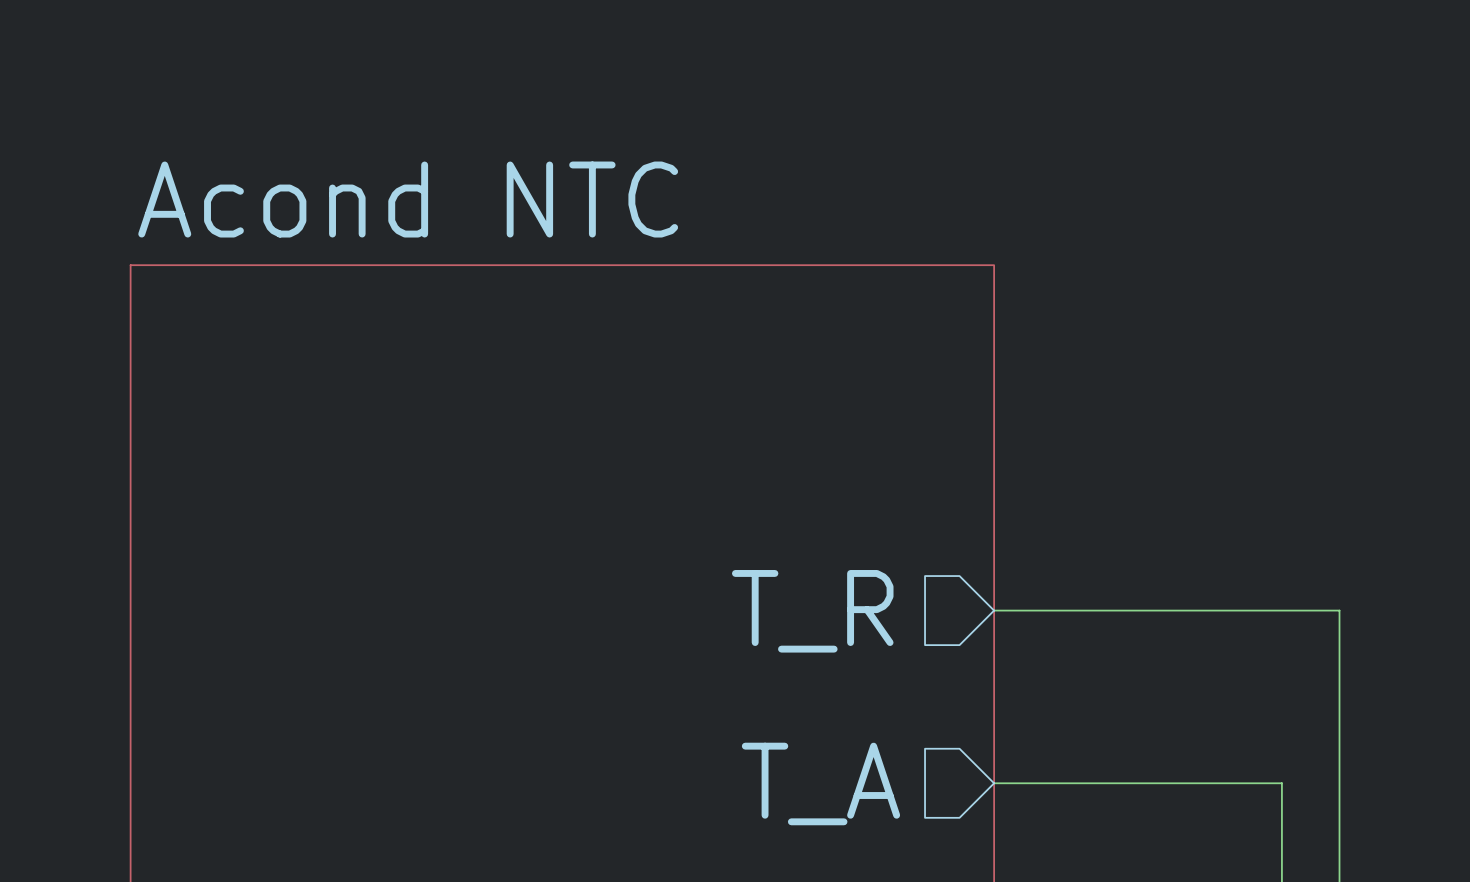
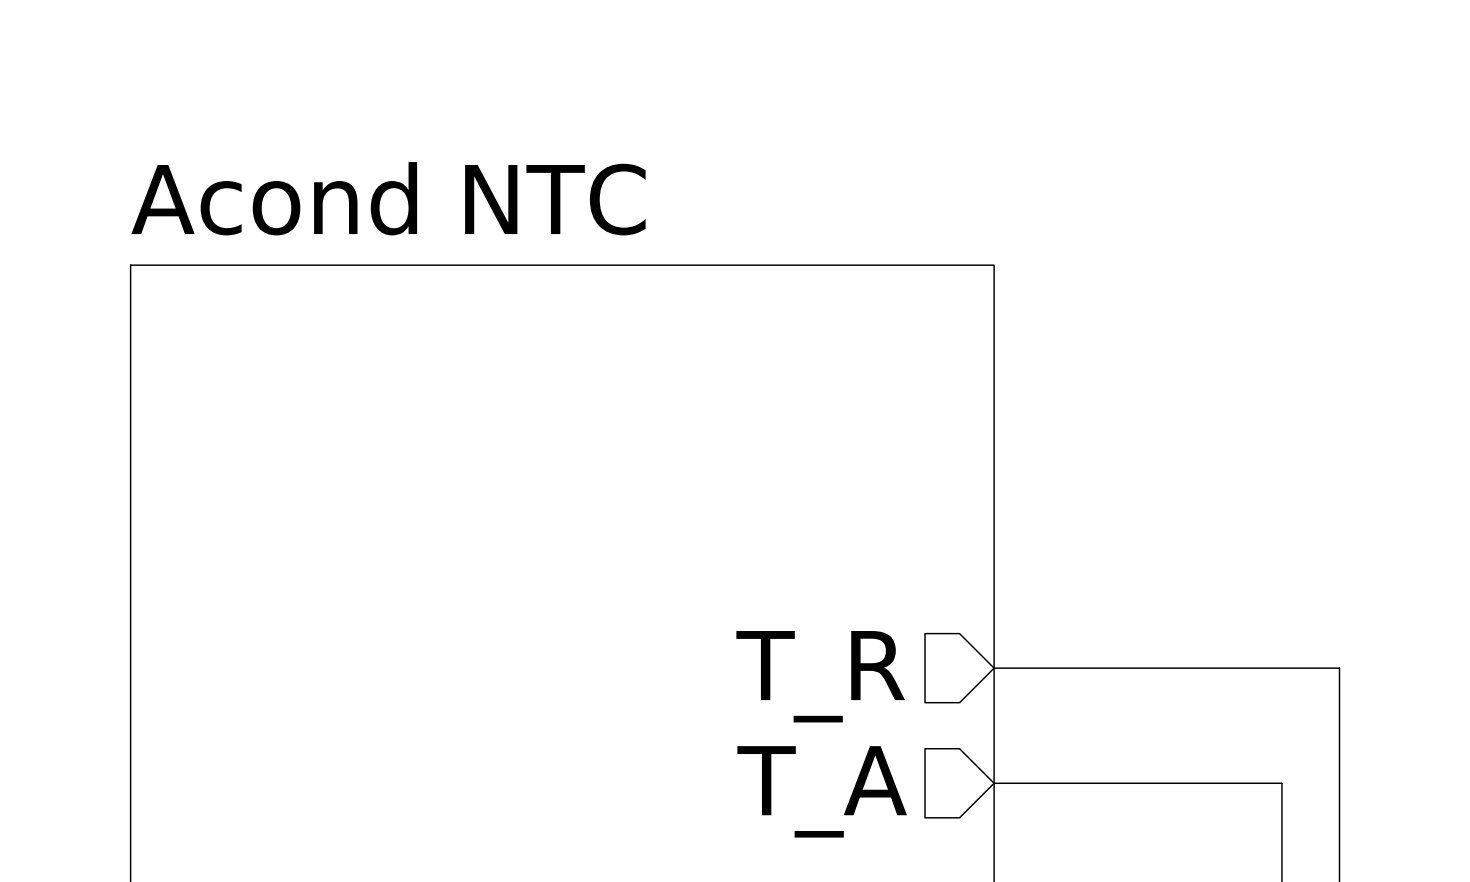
wire: (994, 610) (1339, 610) (1339, 668) -> (994, 668) (1339, 668)
sheet pin position: T_R (812, 611) -> T_R (820, 676)

